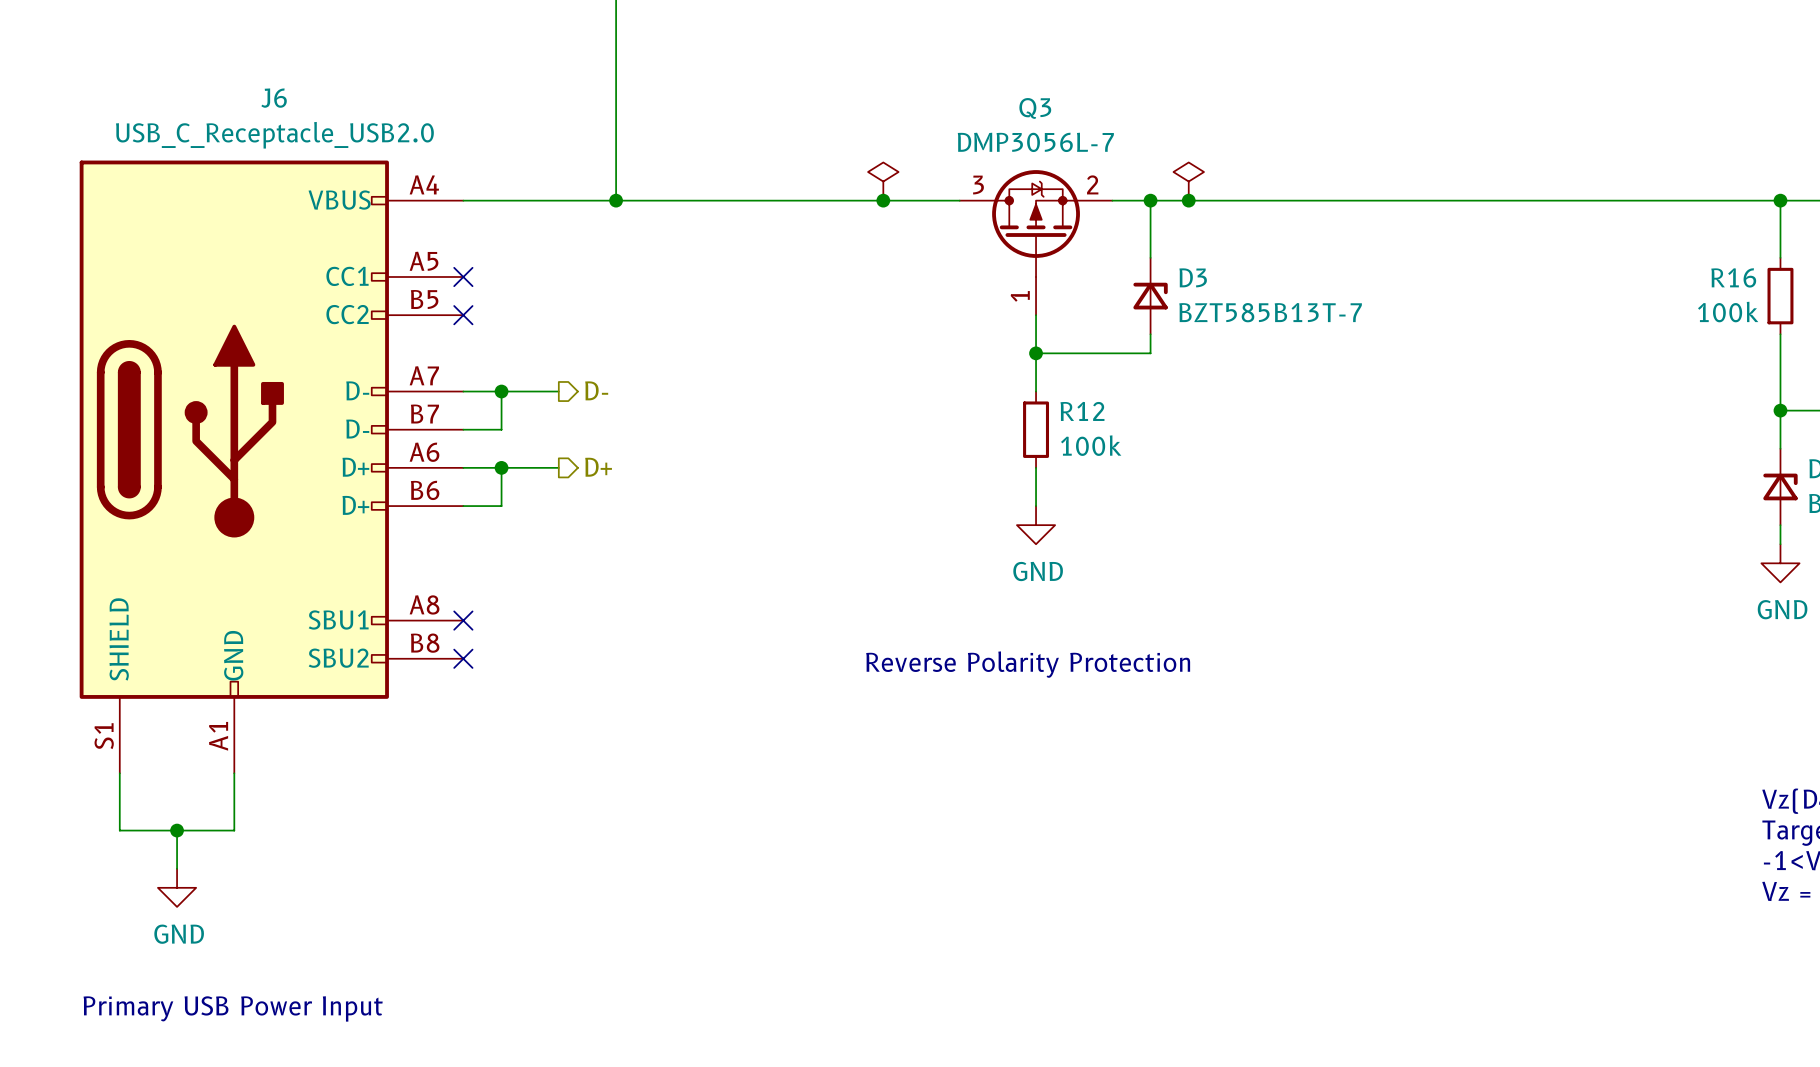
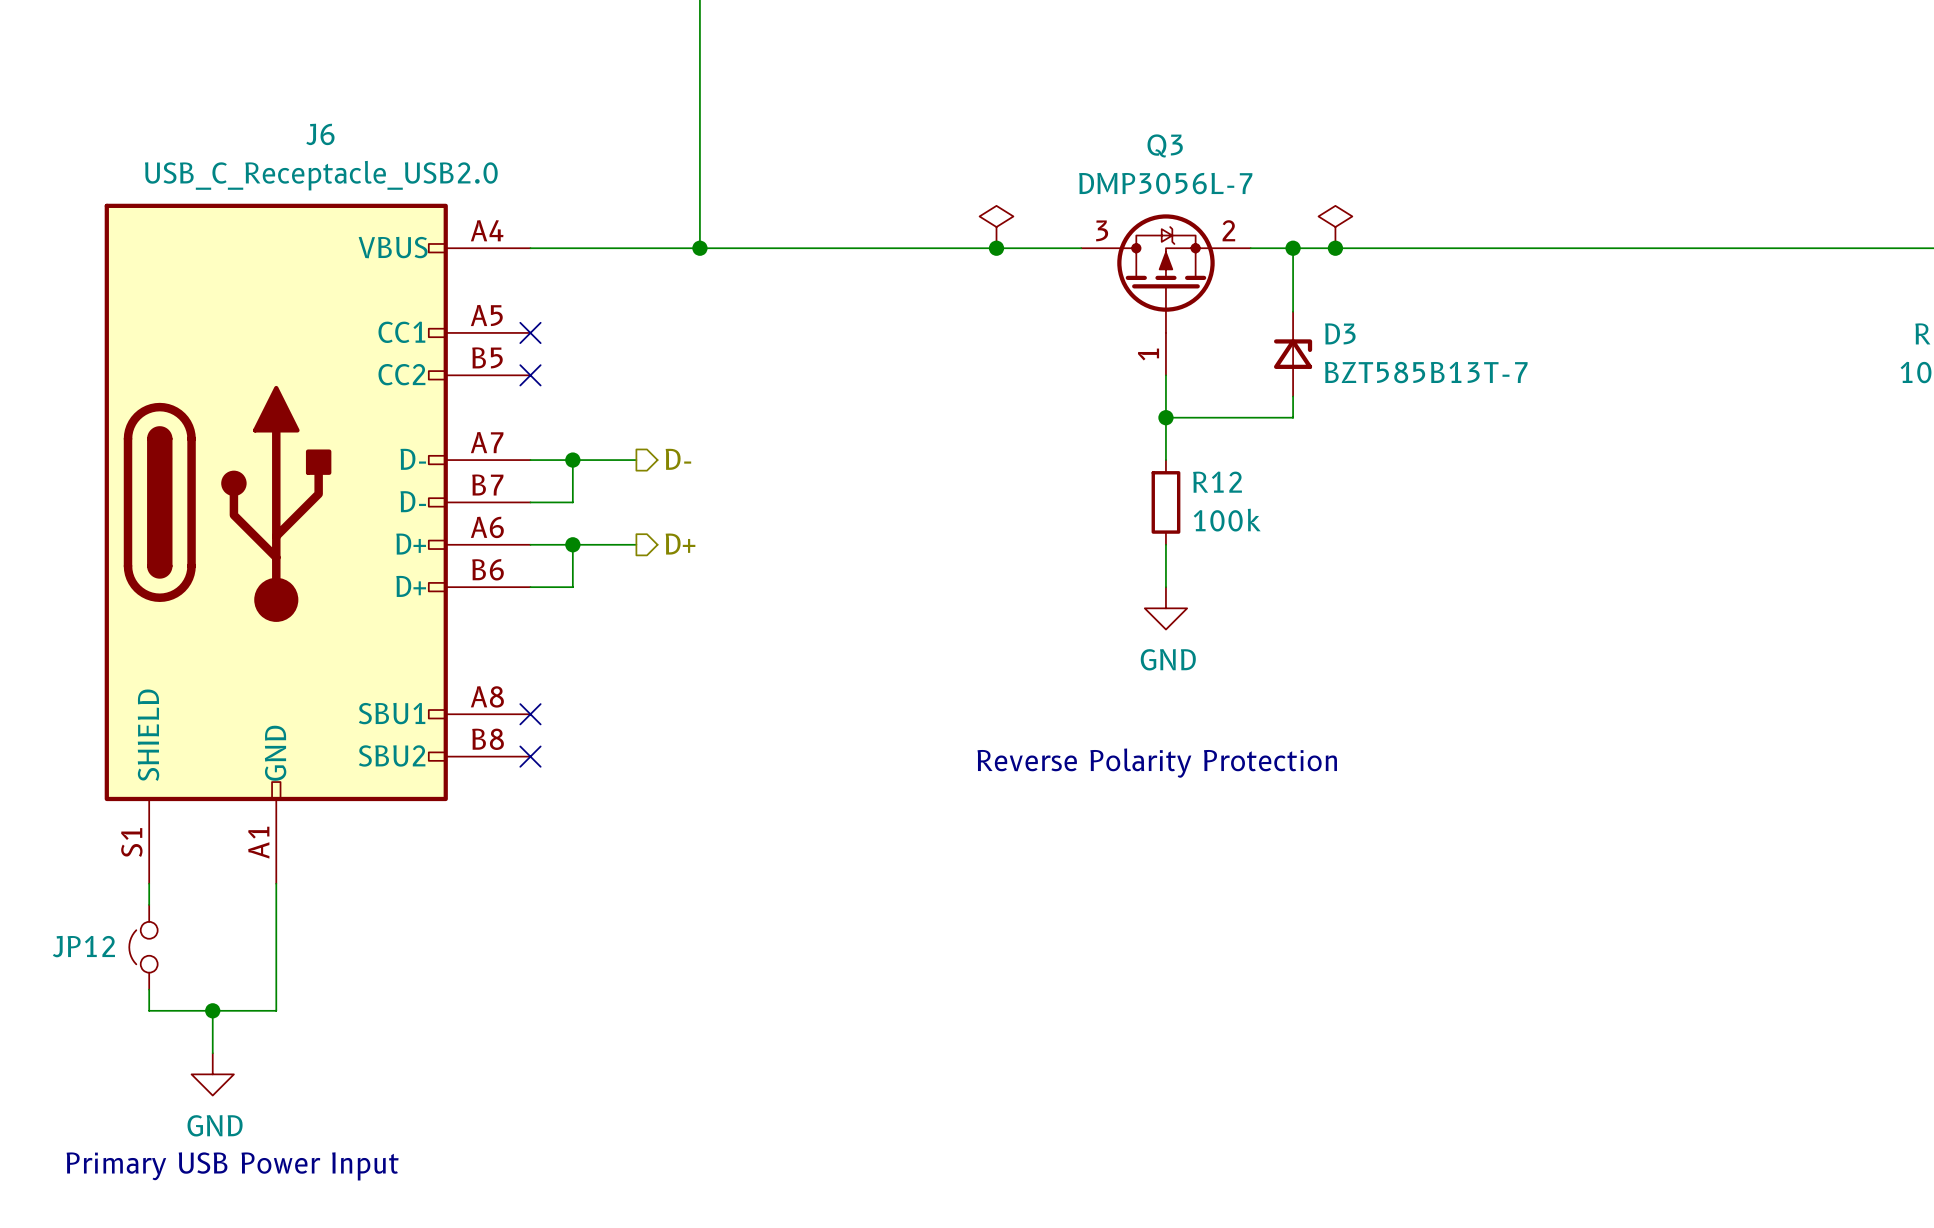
wire: (119, 792) (119, 830) (234, 830) -> (149, 989) (149, 1010) (276, 1010) (276, 947)
JP12: none -> (143, 947)
wire: (177, 830) (177, 868) -> (212, 1010) (212, 1053)
junction position: (177, 830) -> (212, 1010)
power symbol position: GND (177, 887) -> GND (212, 1074)
text position: Primary USB Power Input (233, 1008) -> Primary USB Power Input (232, 1166)

